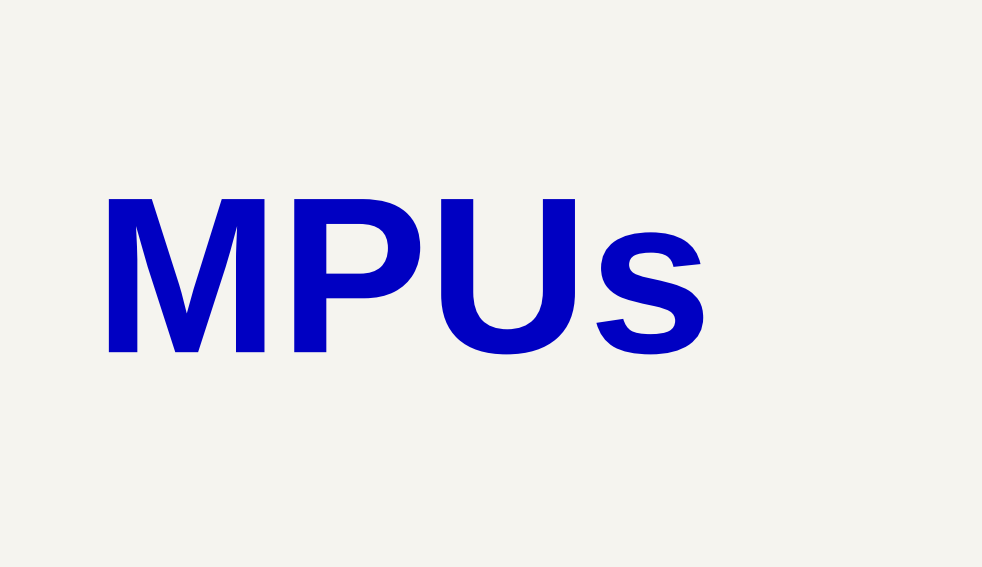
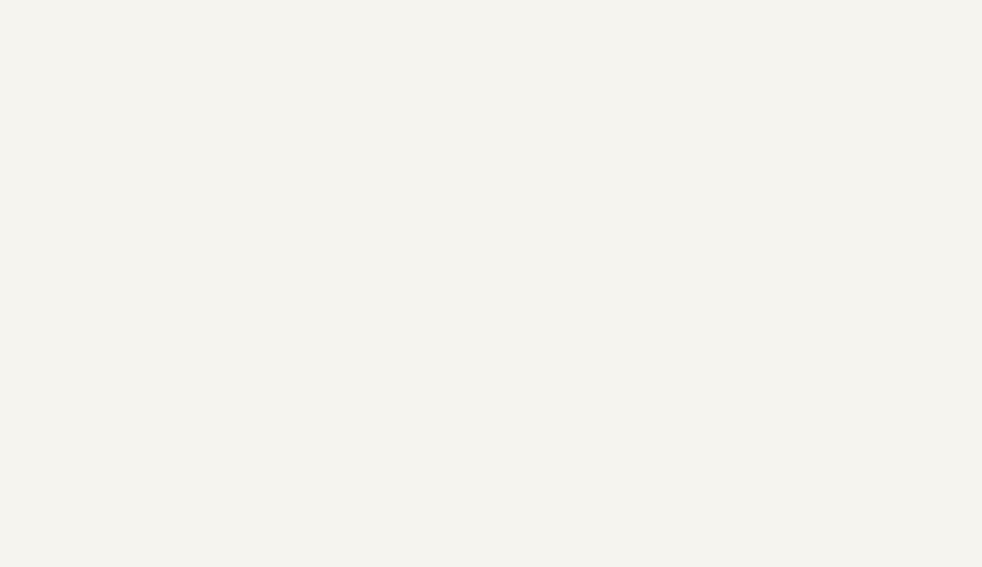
text: MPUs (406, 276) -> none

